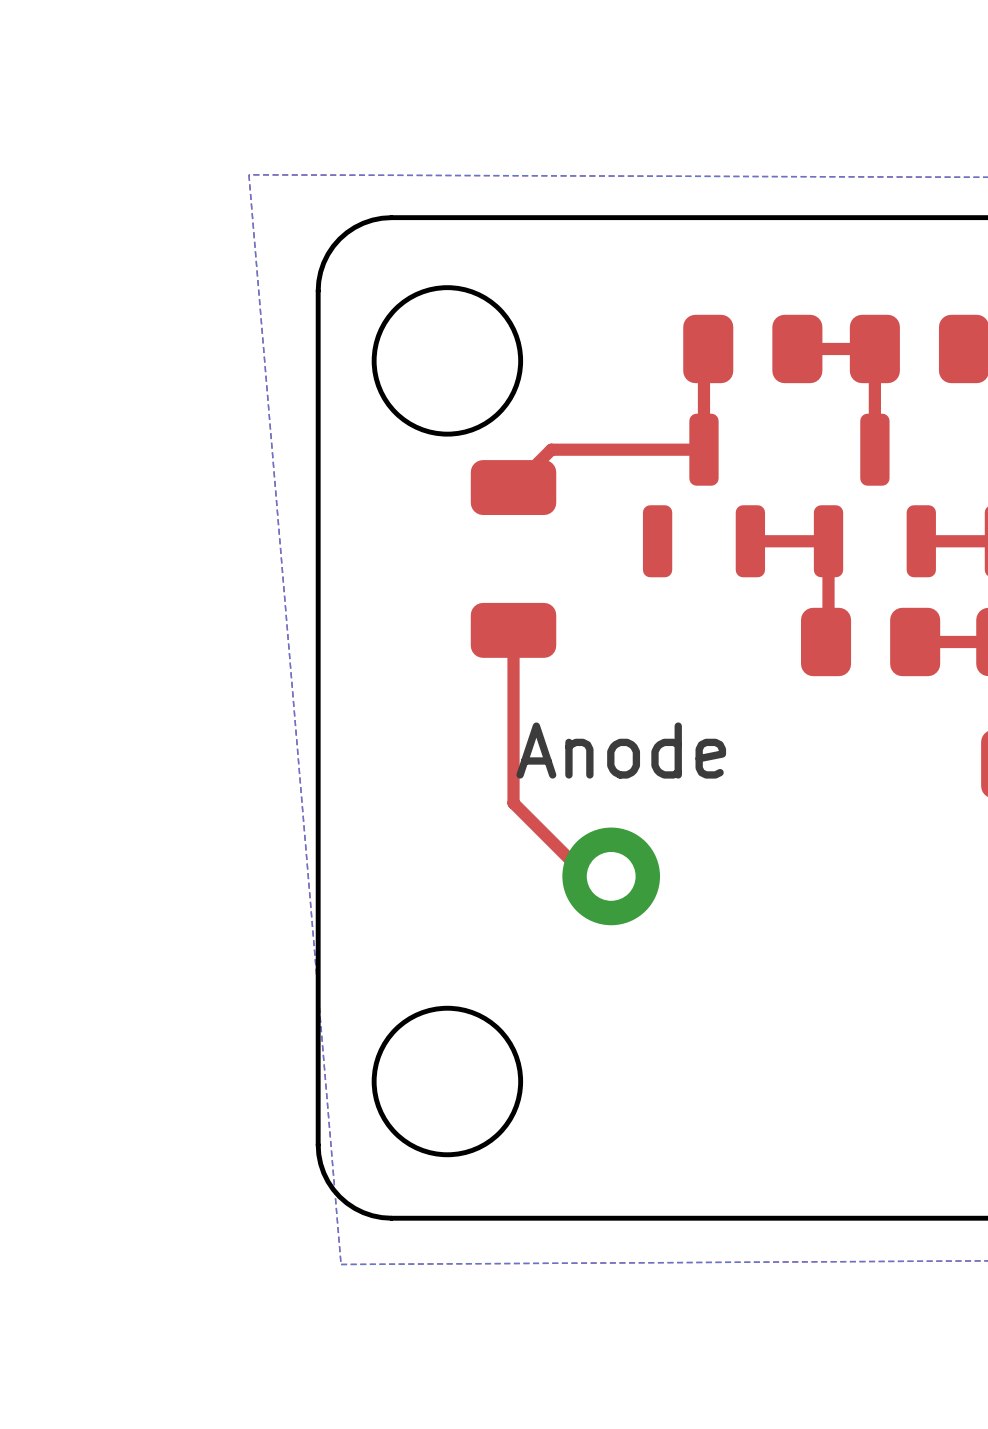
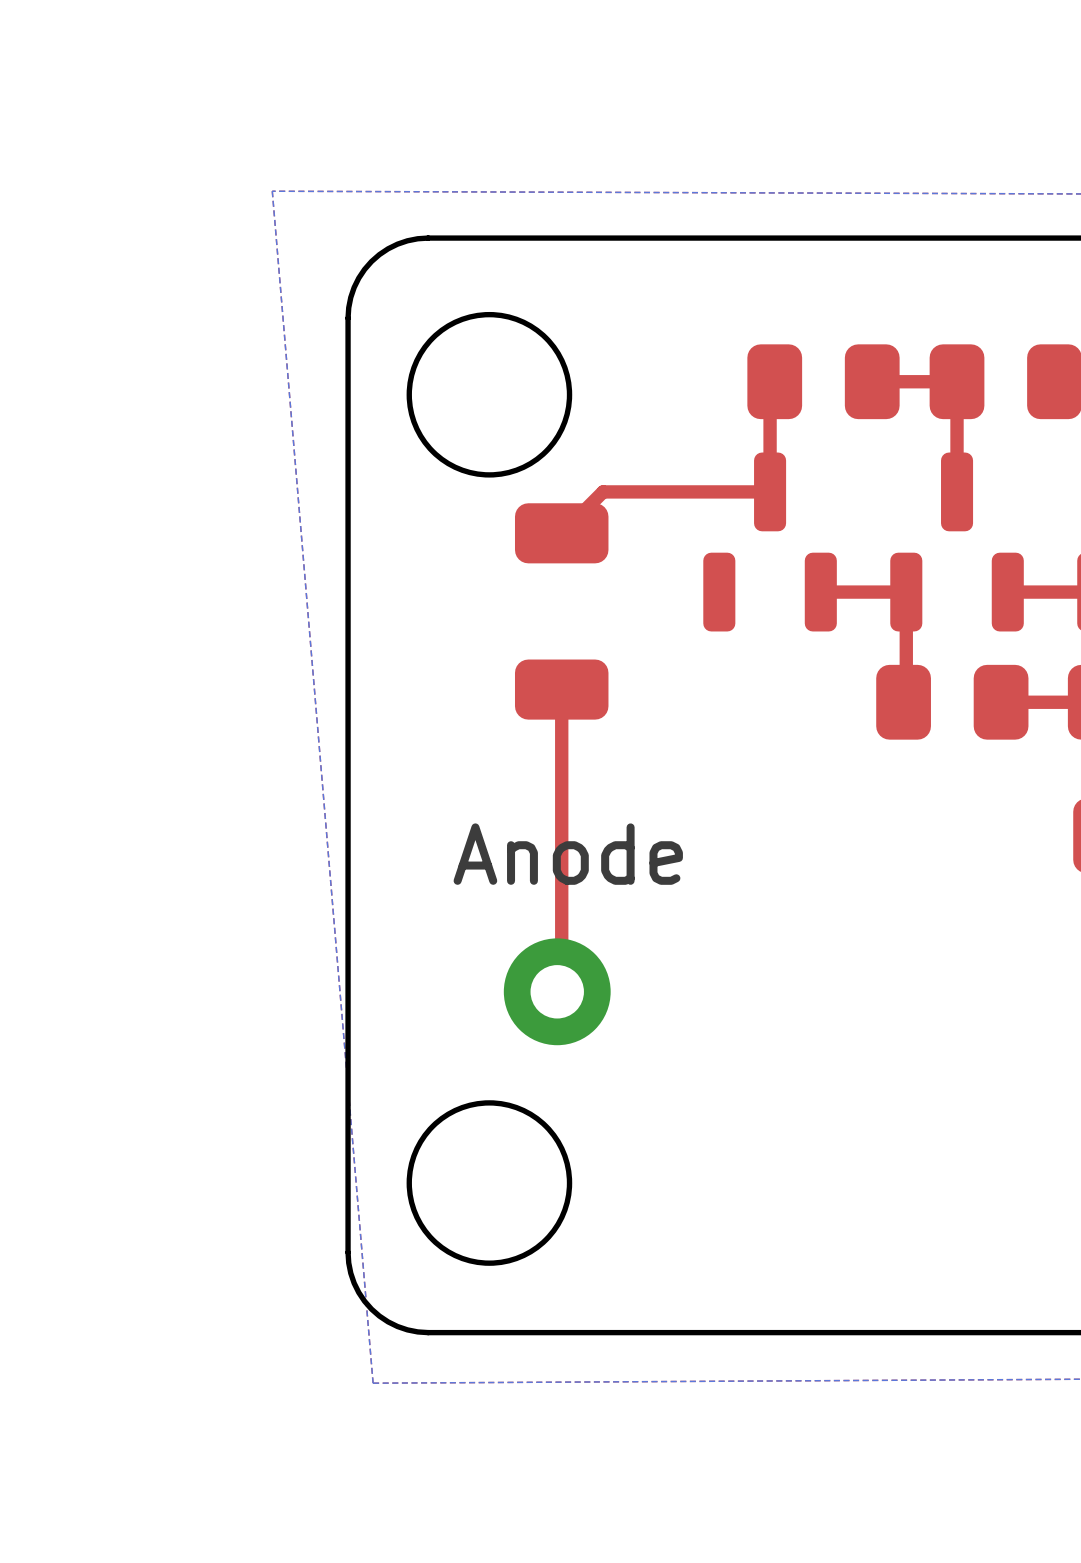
top track: (513, 803) (586, 876) (611, 876) -> (561, 878) (561, 987) (557, 991)
part position: (611, 876) -> (557, 991)

